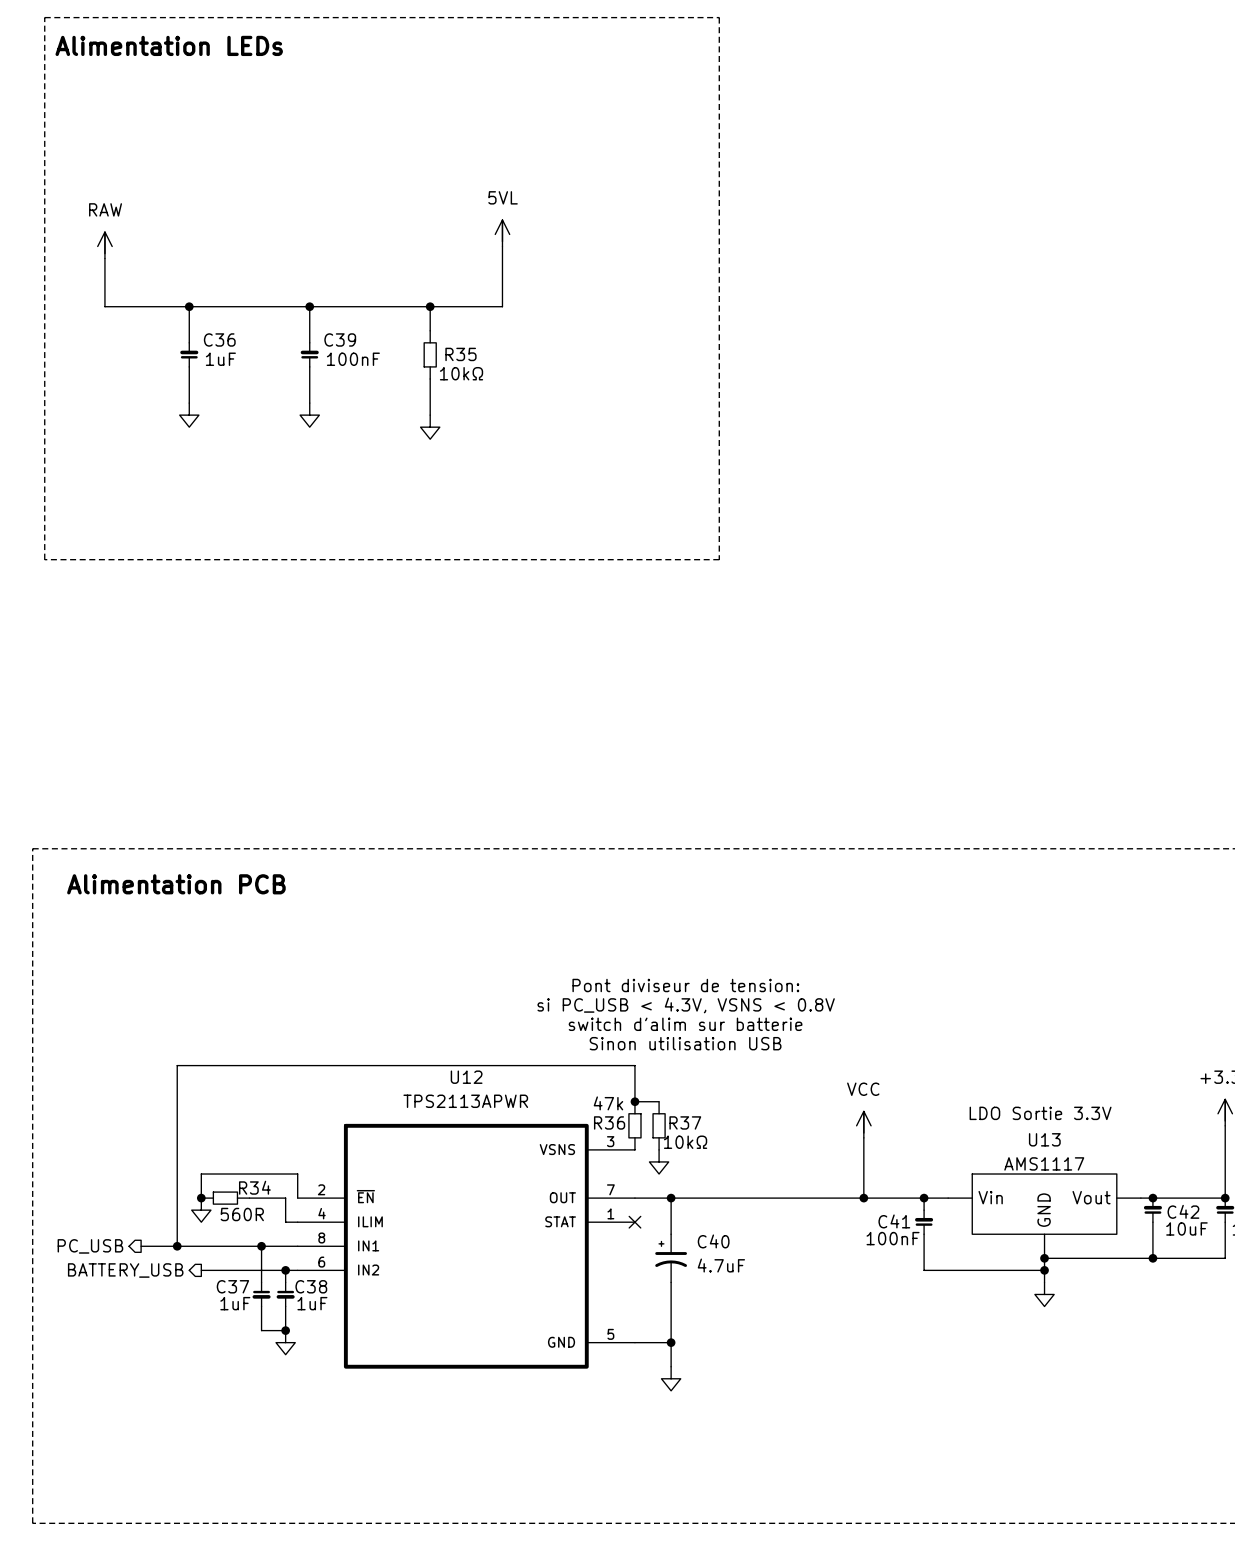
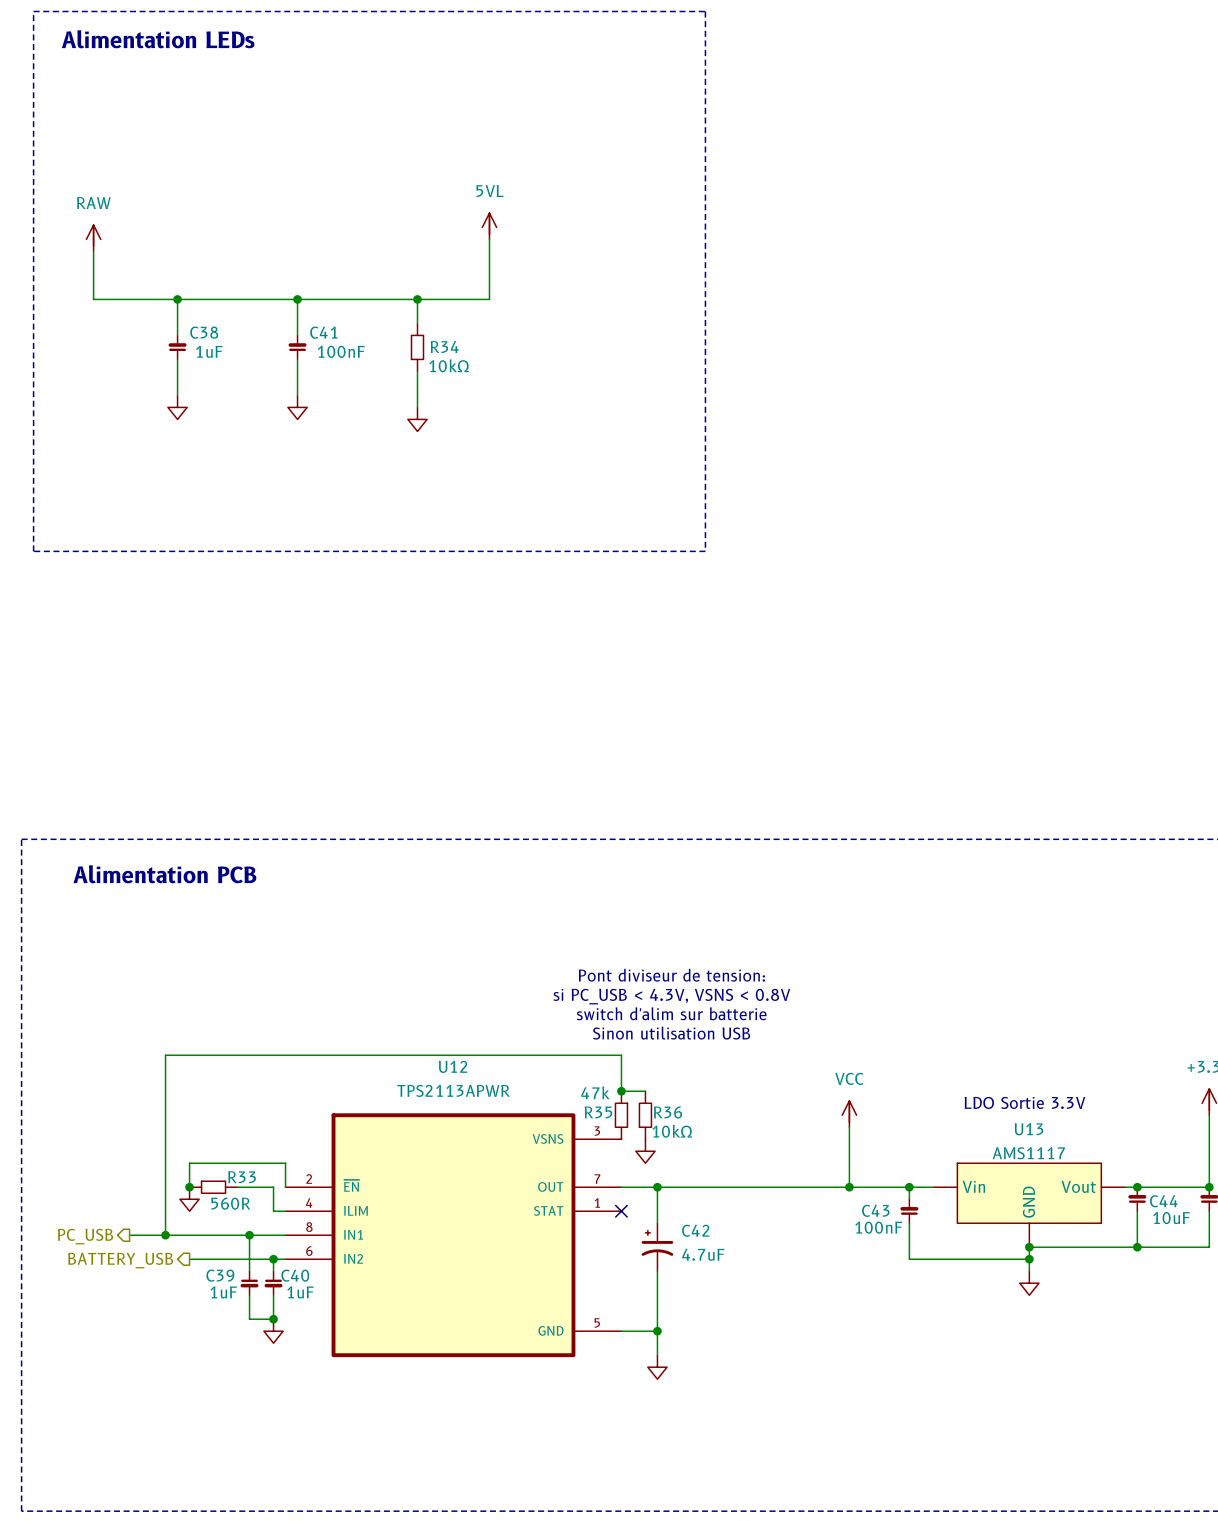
C36 name: C36 (219, 339) -> C38 (204, 332)
C39 name: C39 (340, 339) -> C41 (323, 332)
R35 name: R35 (460, 354) -> R34 (444, 346)
R36 name: R36 (609, 1122) -> R35 (598, 1112)
R37 name: R37 (685, 1122) -> R36 (667, 1112)
R34 name: R34 (254, 1187) -> R33 (241, 1177)
C42 name: C42 (1183, 1211) -> C44 (1163, 1201)
C41 name: C41 (894, 1221) -> C43 (875, 1210)
C40 name: C40 (713, 1241) -> C42 (695, 1230)
C37 name: C37 (232, 1286) -> C39 (220, 1275)
C38 name: C38 (311, 1286) -> C40 (295, 1275)

